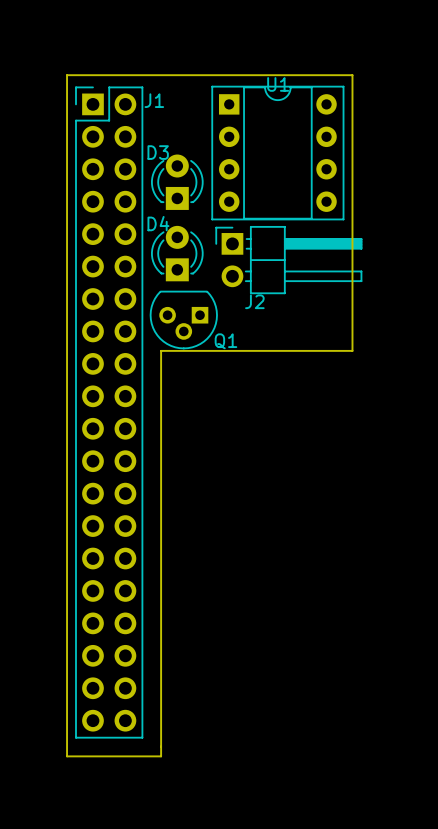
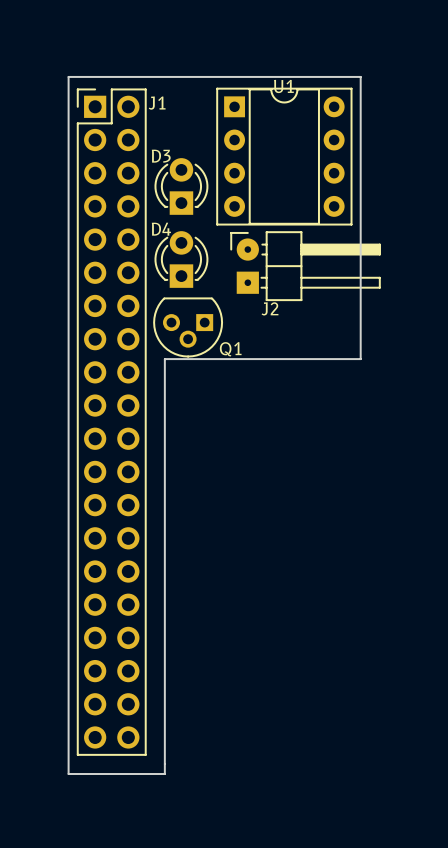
J2 footprint: [215, 226, 363, 295] -> [230, 231, 381, 301]

